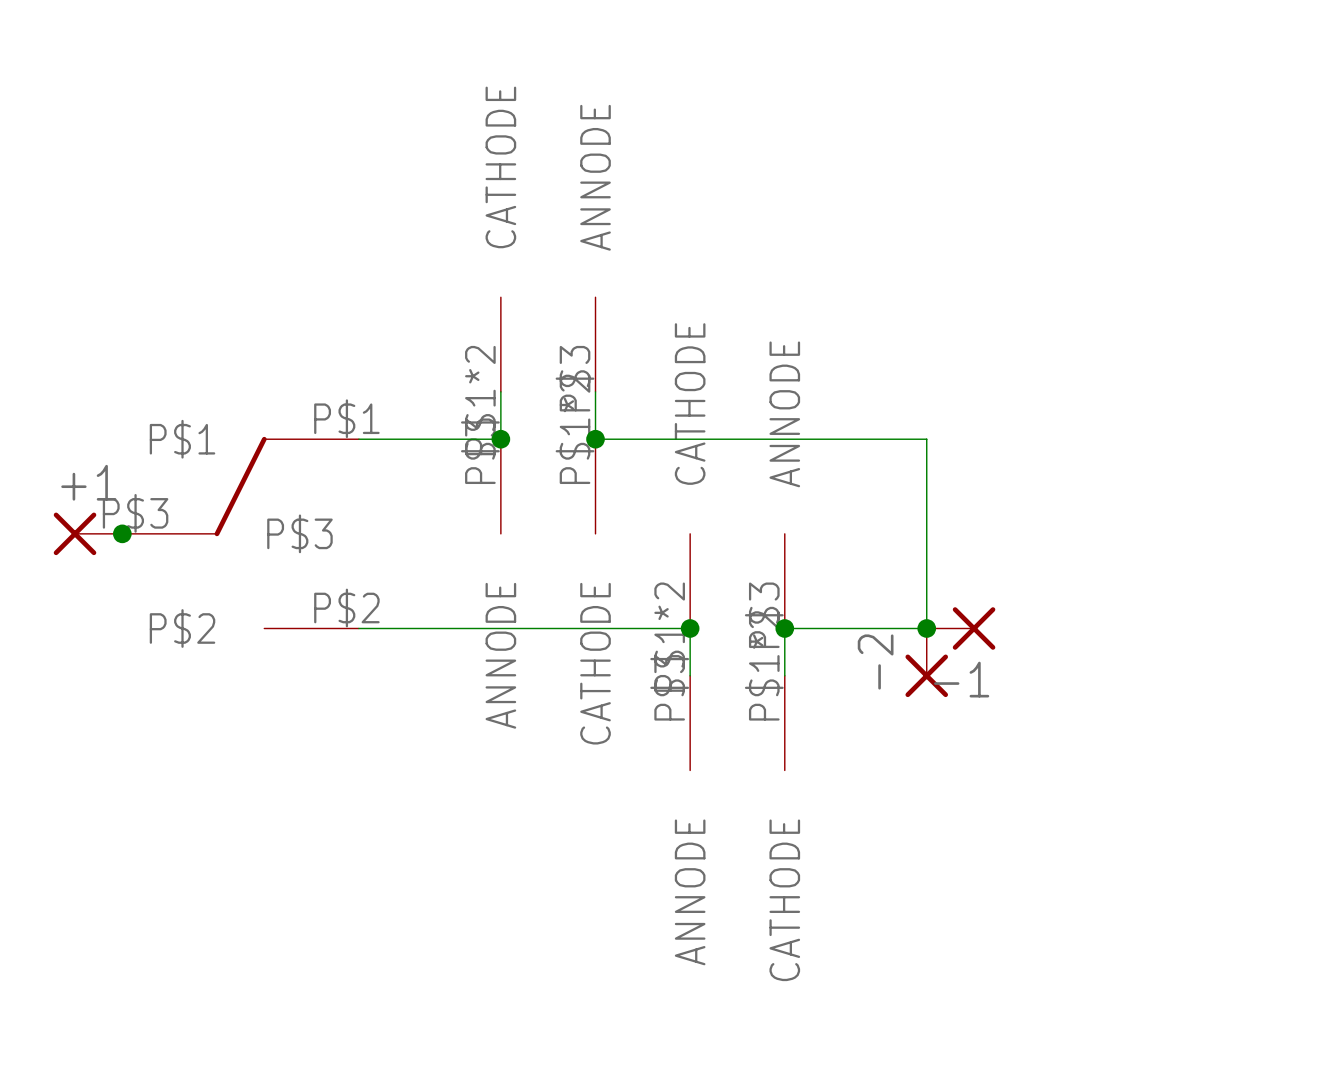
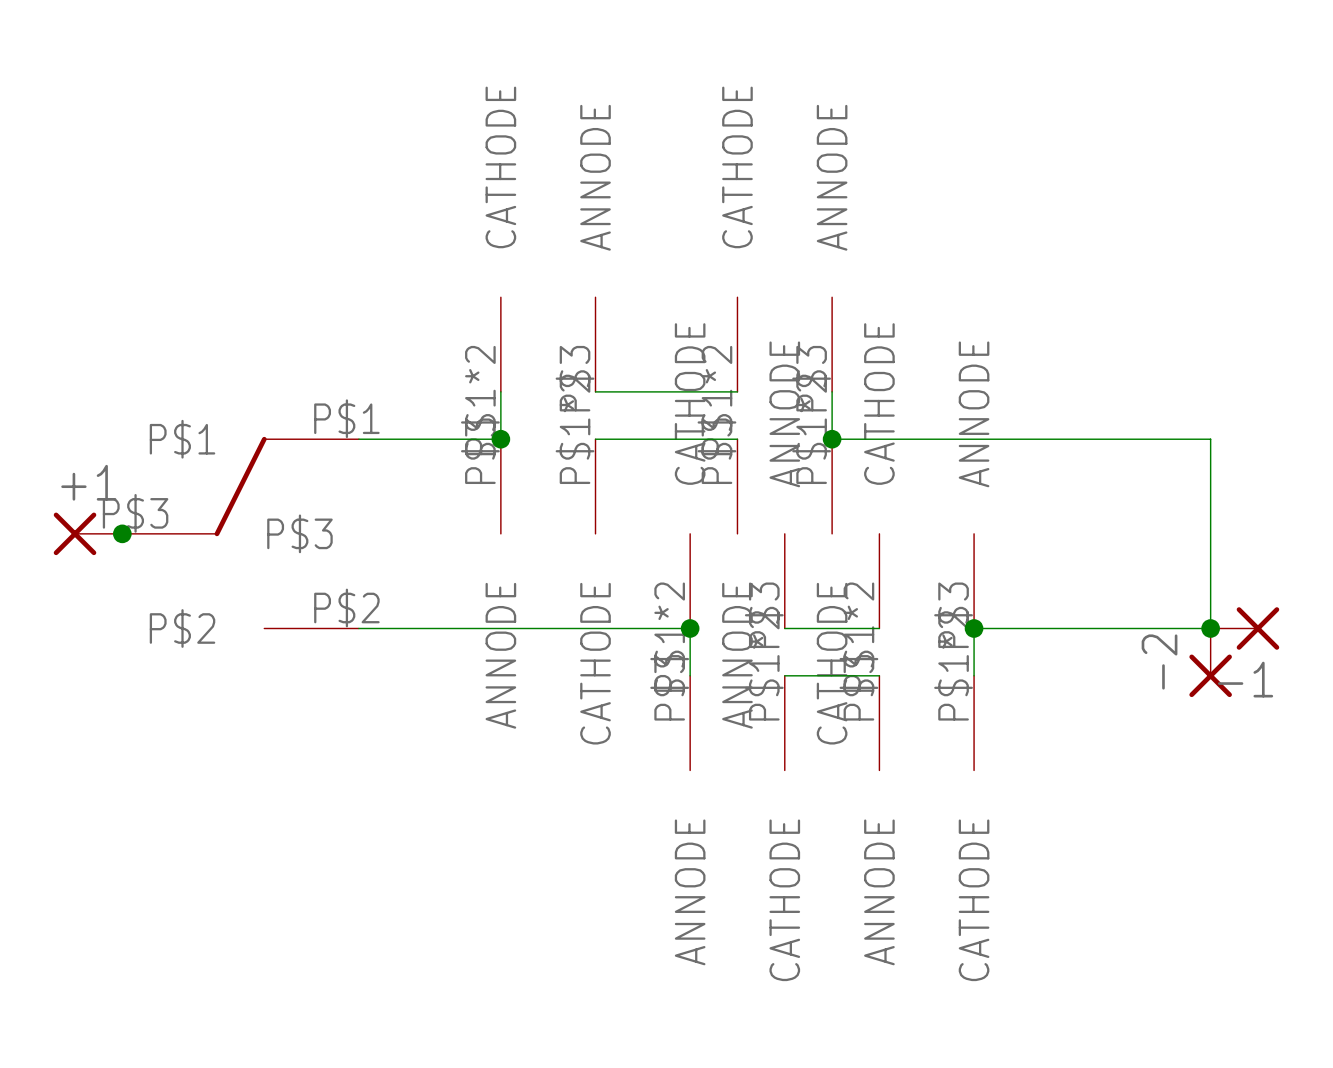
part: none -> (784, 344)
wire: (595, 391) (595, 439) -> (595, 391) (737, 391)
junction: (595, 439) -> none
wire: (737, 439) (832, 439) -> (832, 391) (832, 439)
junction: none -> (832, 439)
wire: (926, 439) (926, 628) (879, 628) -> (926, 439) (1210, 439) (1210, 628) (974, 628) (974, 675)
part: none -> (784, 486)
part: none -> (926, 581)
wire: (784, 628) (784, 675) -> (879, 675) (784, 675)
junction: (784, 628) -> none
junction position: (926, 628) -> (974, 628)
-1 position: (961, 628) -> (1244, 628)
junction: none -> (1210, 628)
-2 position: (926, 662) -> (1210, 662)
part: none -> (926, 723)

